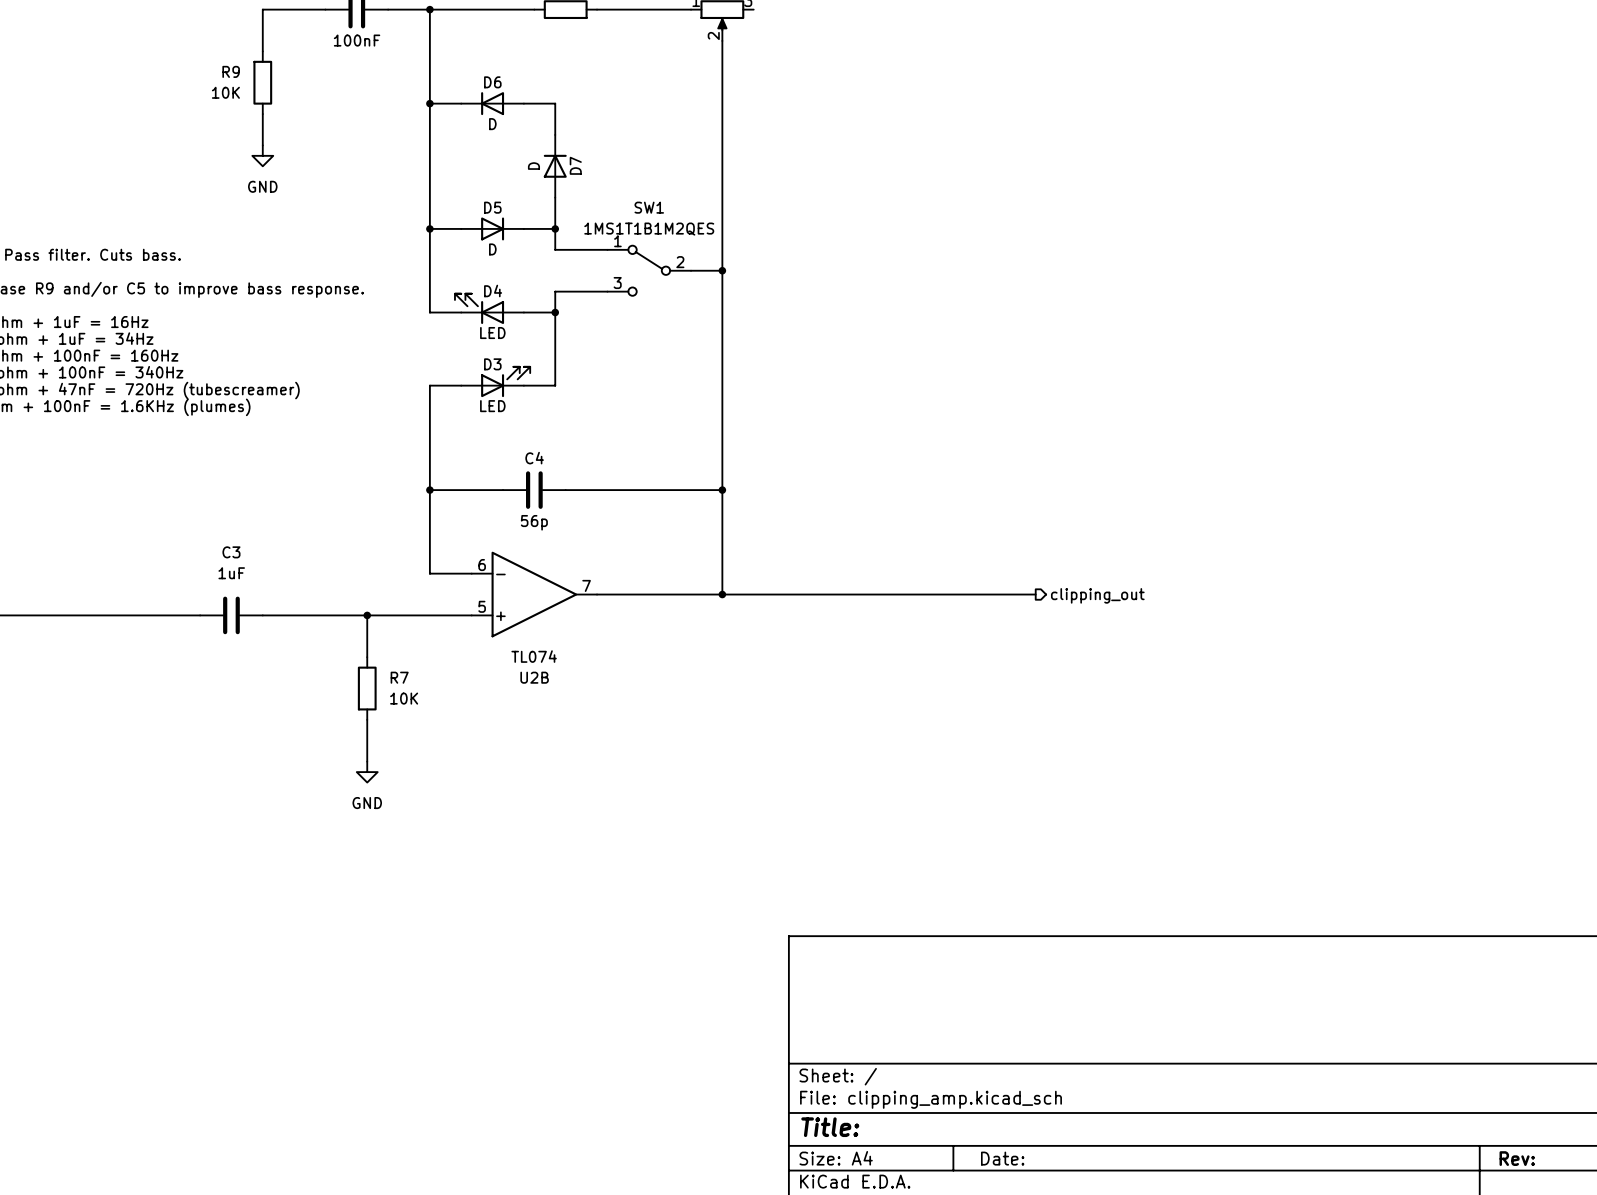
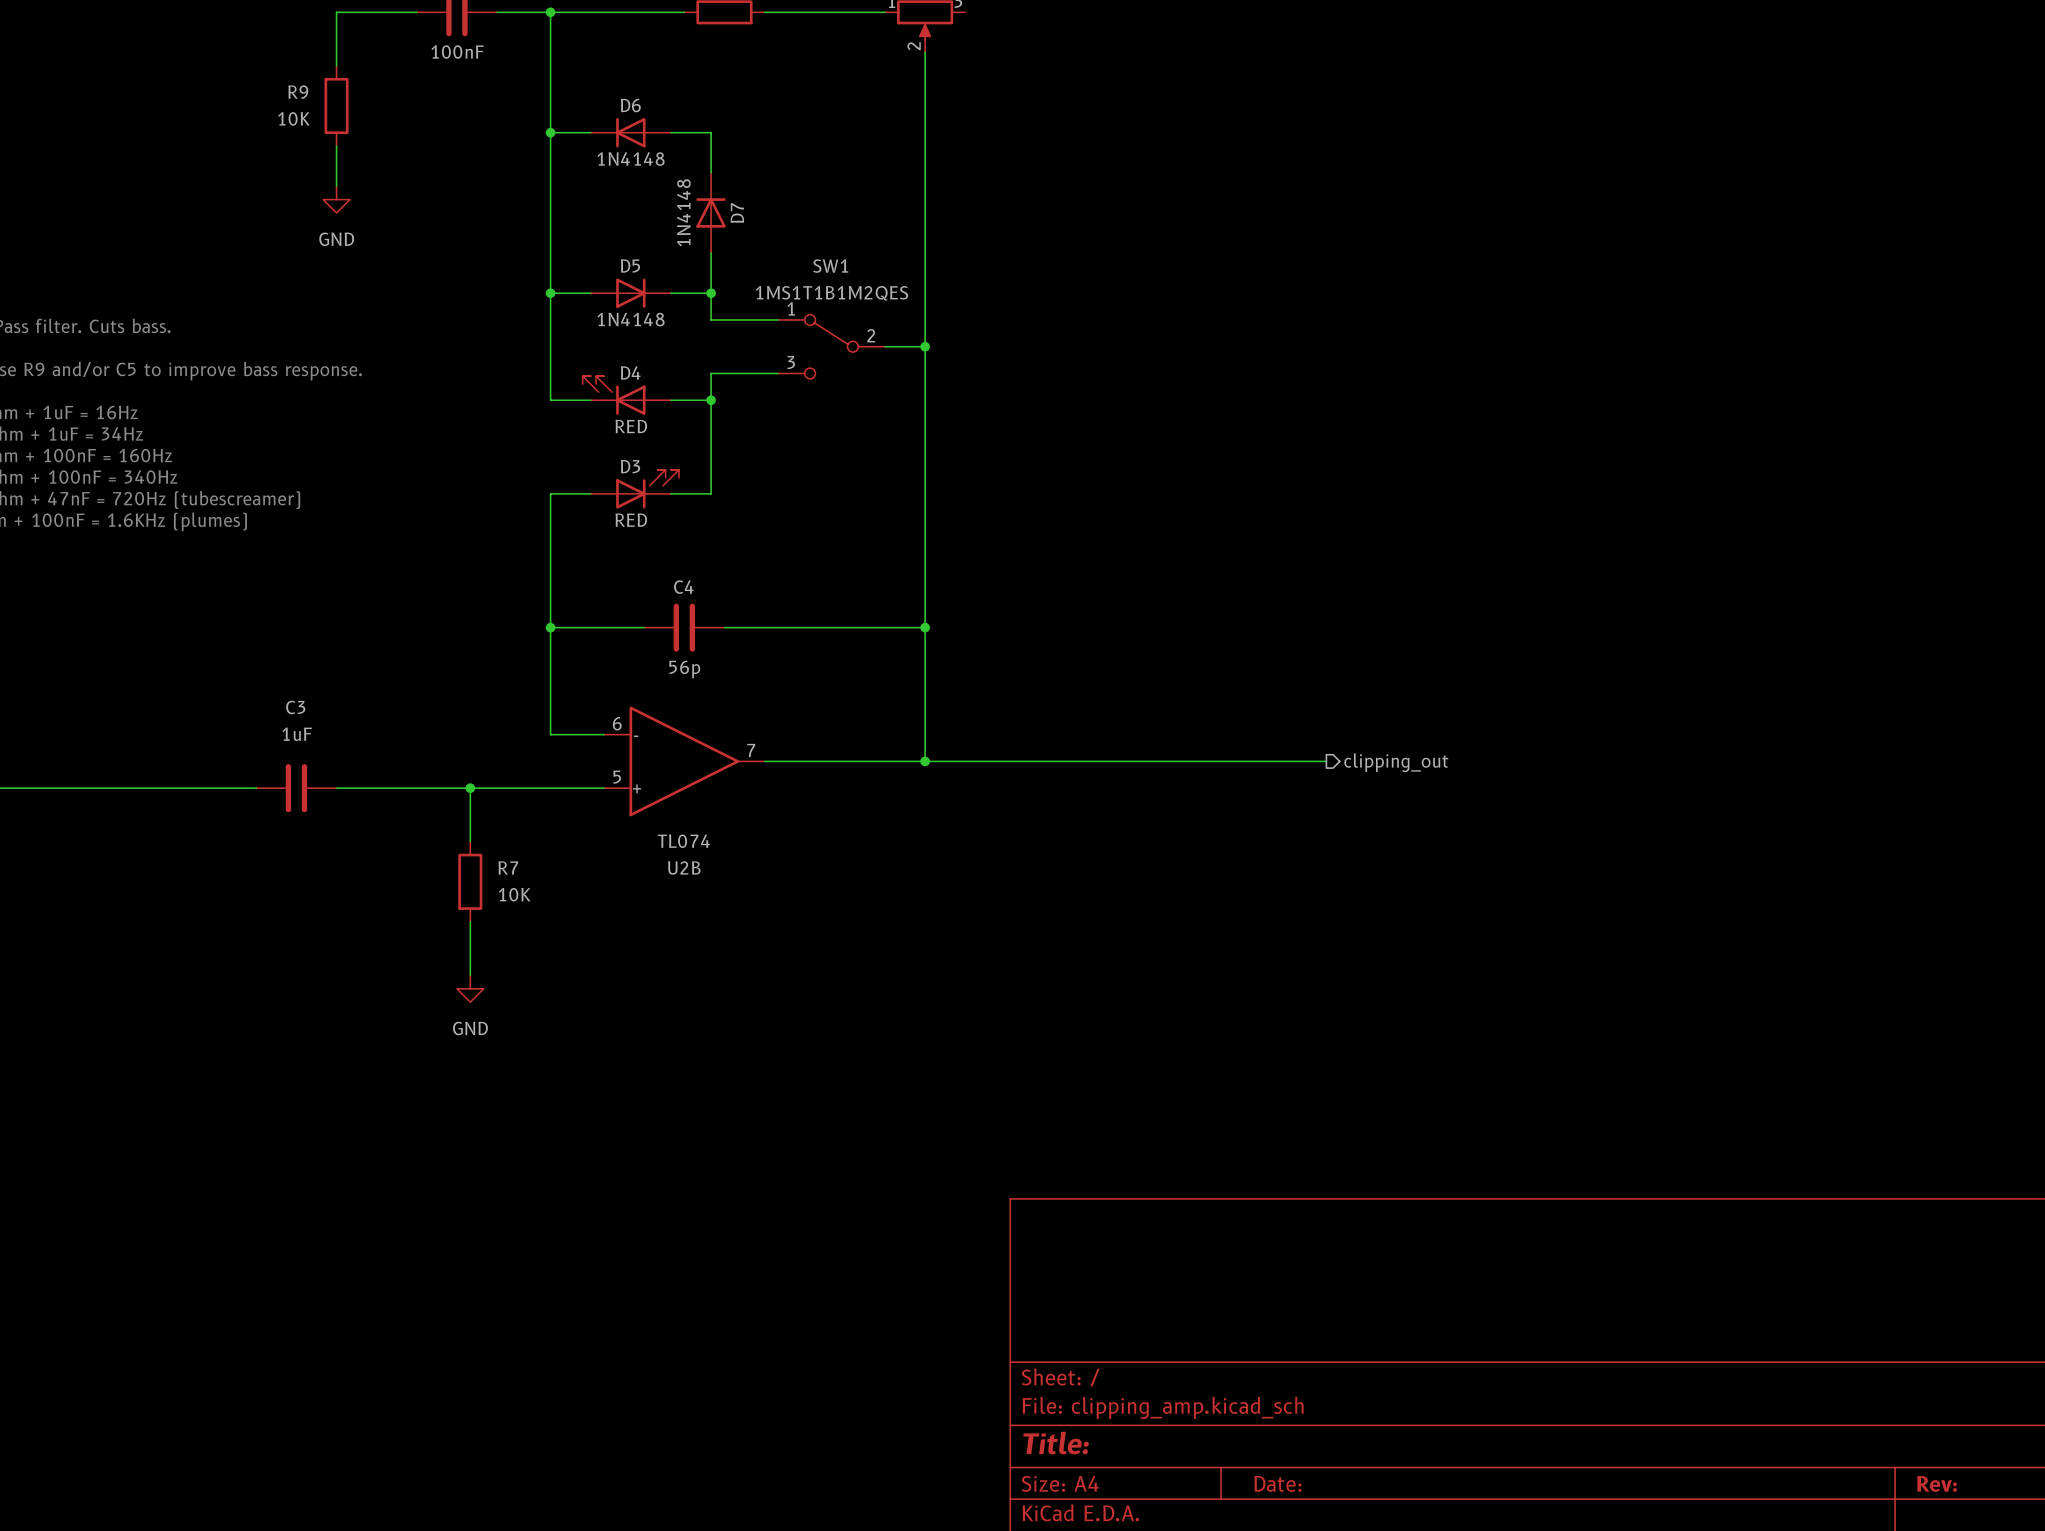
D6 value: D (492, 124) -> 1N4148 (630, 159)
D7 value: D (533, 166) -> 1N4148 (683, 212)
D5 value: D (492, 249) -> 1N4148 (630, 319)
D4 value: LED (492, 333) -> RED (631, 426)
D3 value: LED (492, 406) -> RED (631, 520)

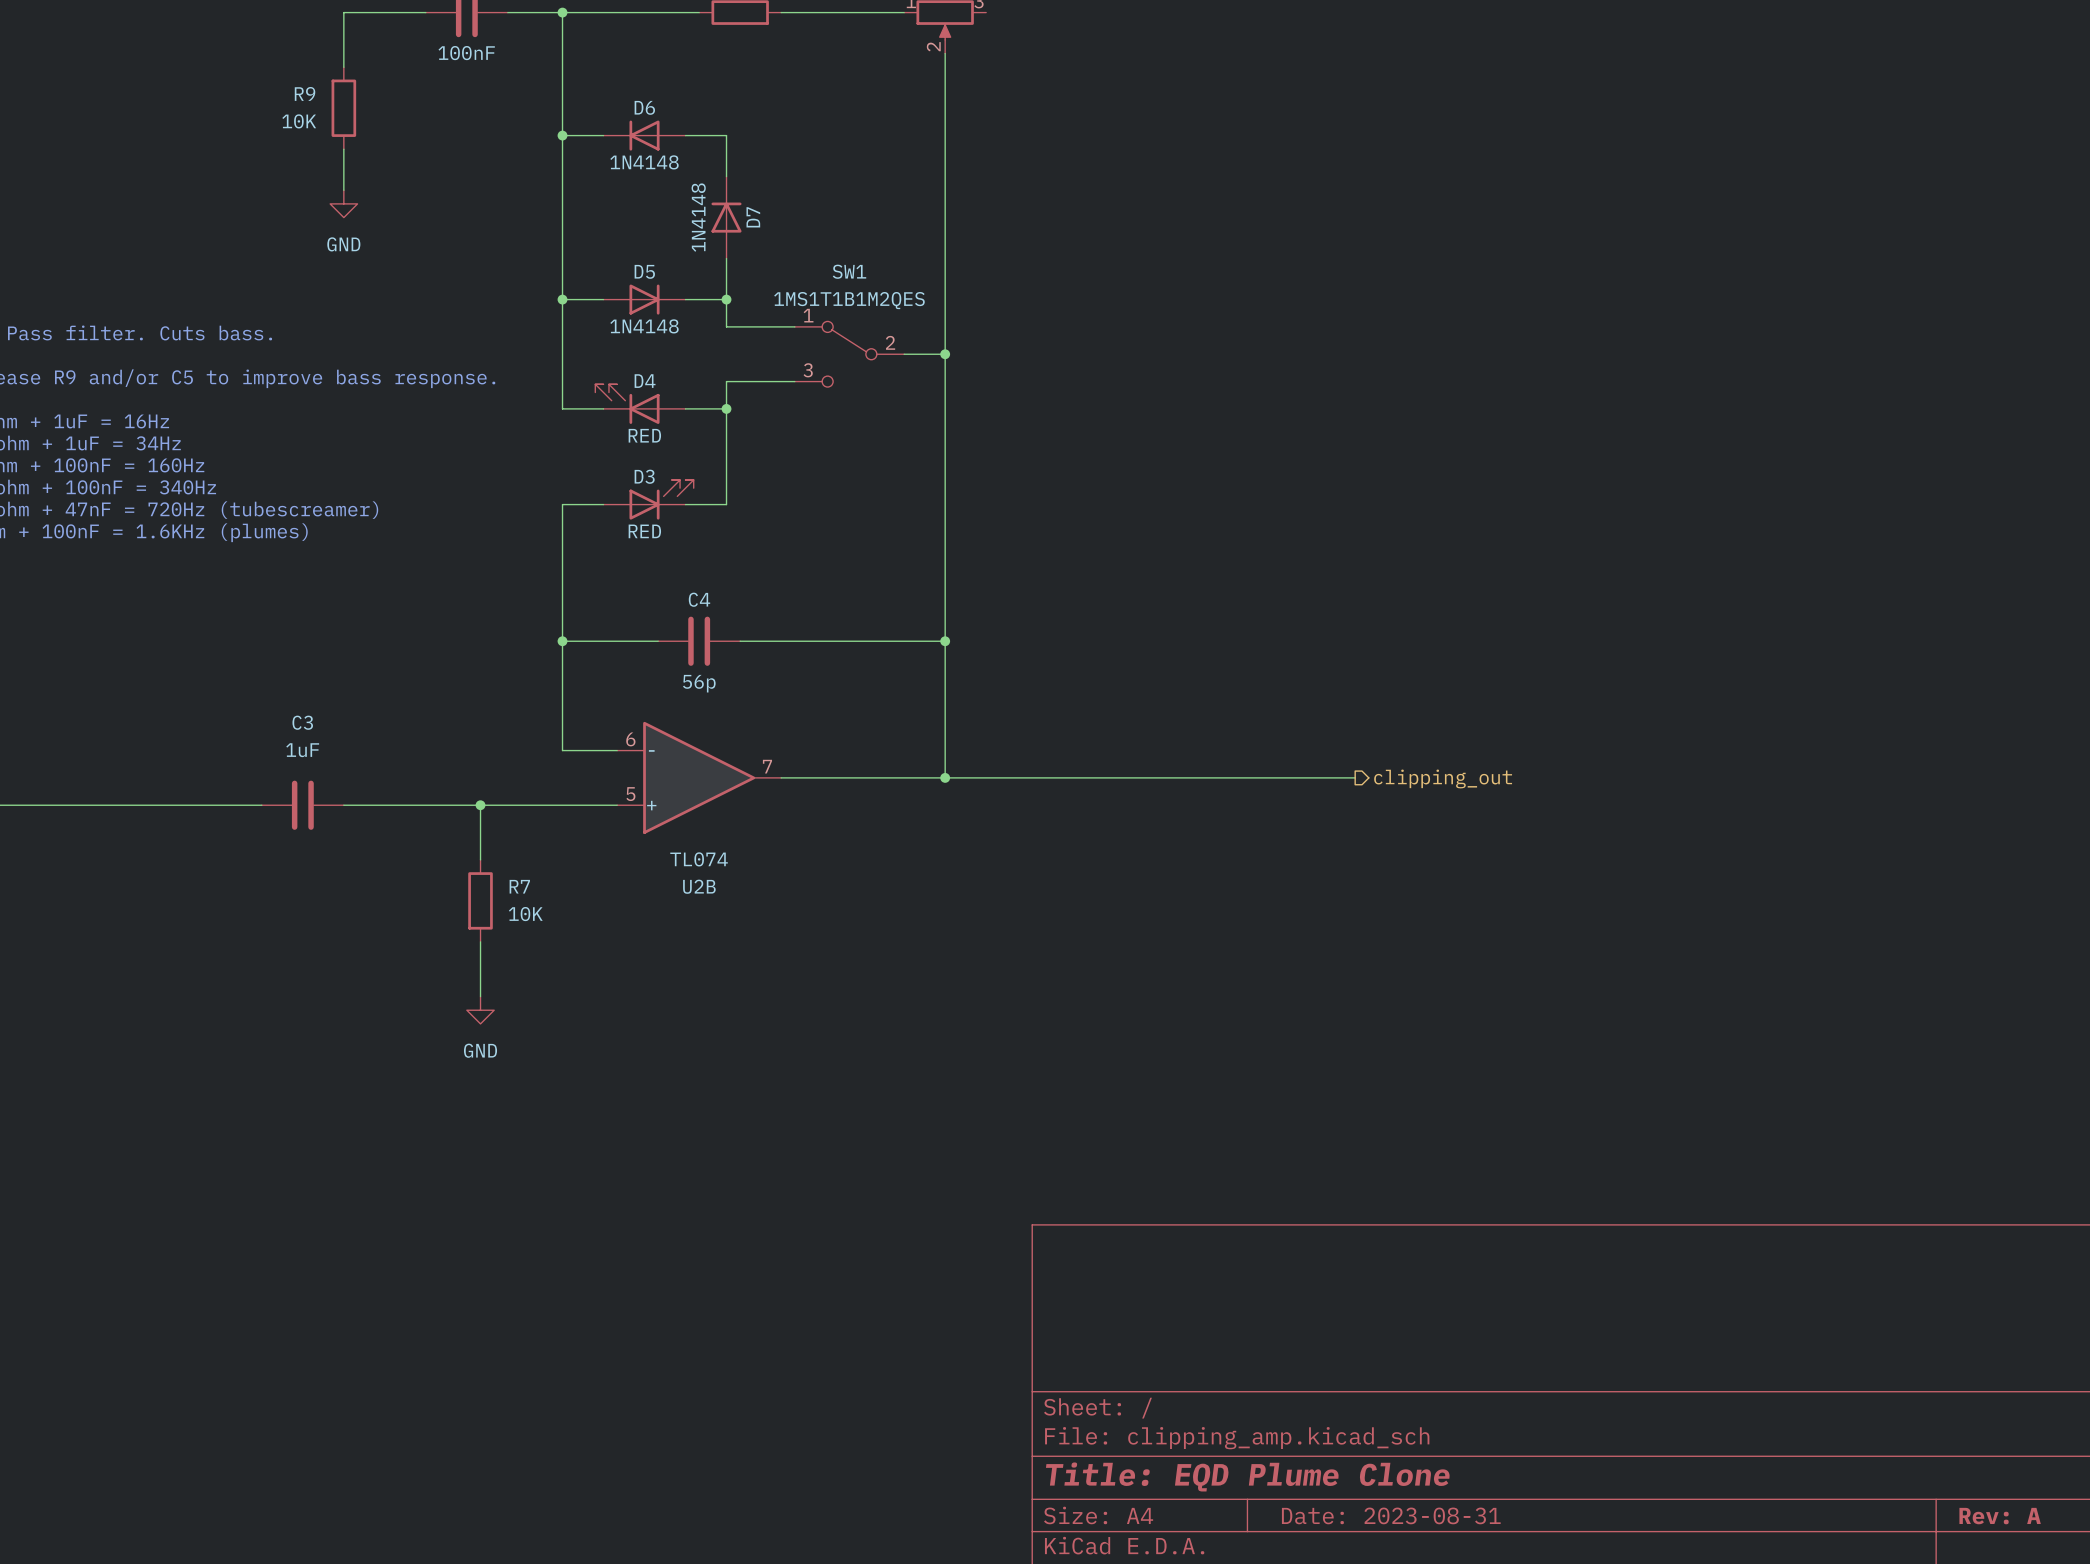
title block: Title: (1056, 1442) -> Title: EQD Plume Clone (1247, 1476)
title block: Date: (1277, 1483) -> Date: 2023-08-31 (1391, 1515)
title block: Rev: (1936, 1483) -> Rev: A (2000, 1516)

